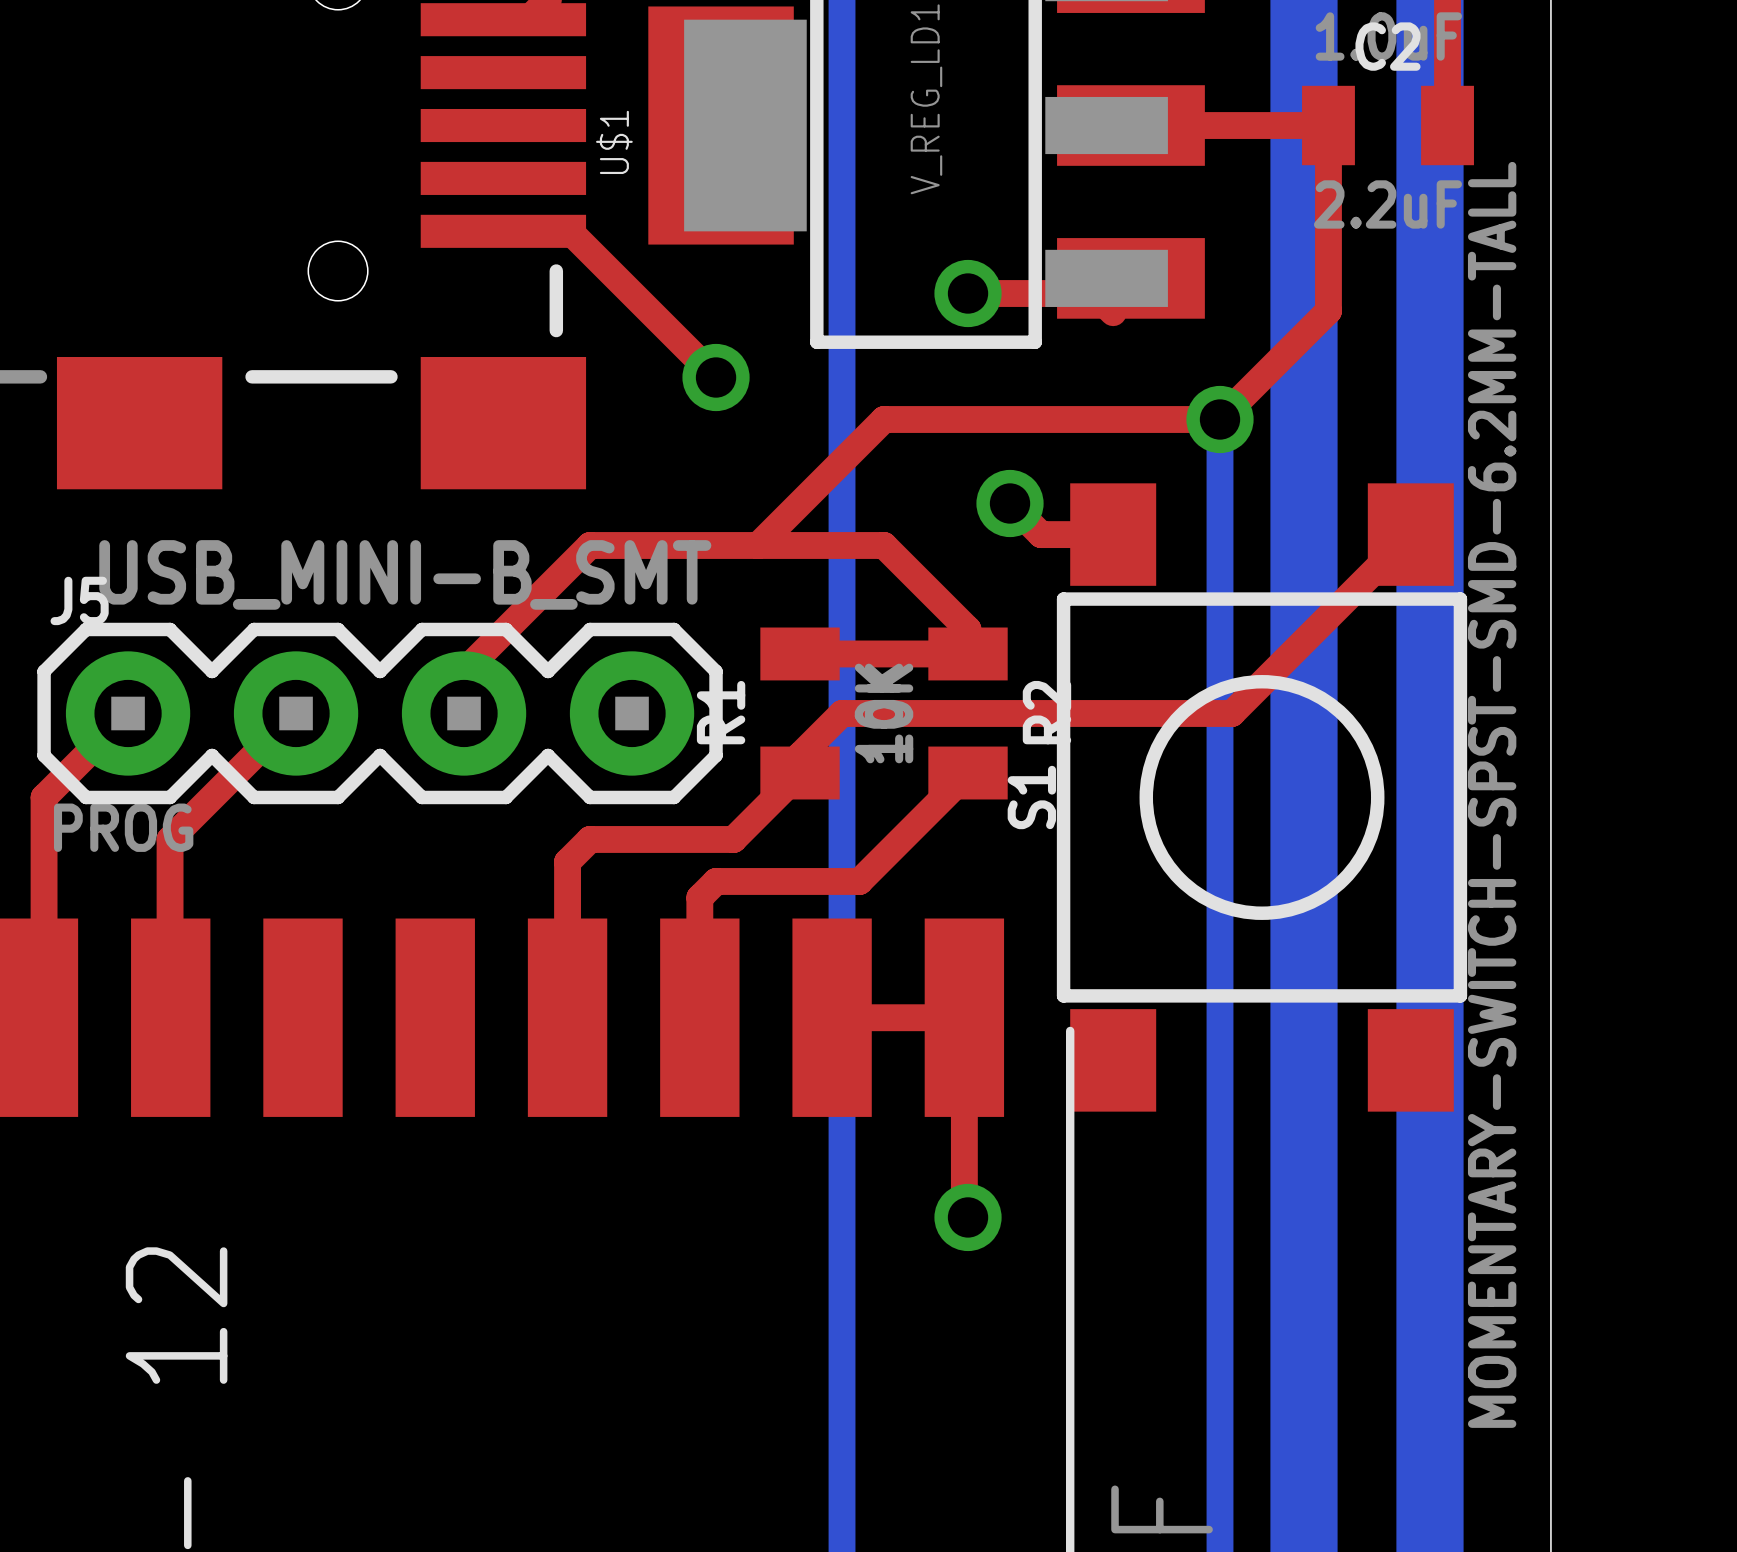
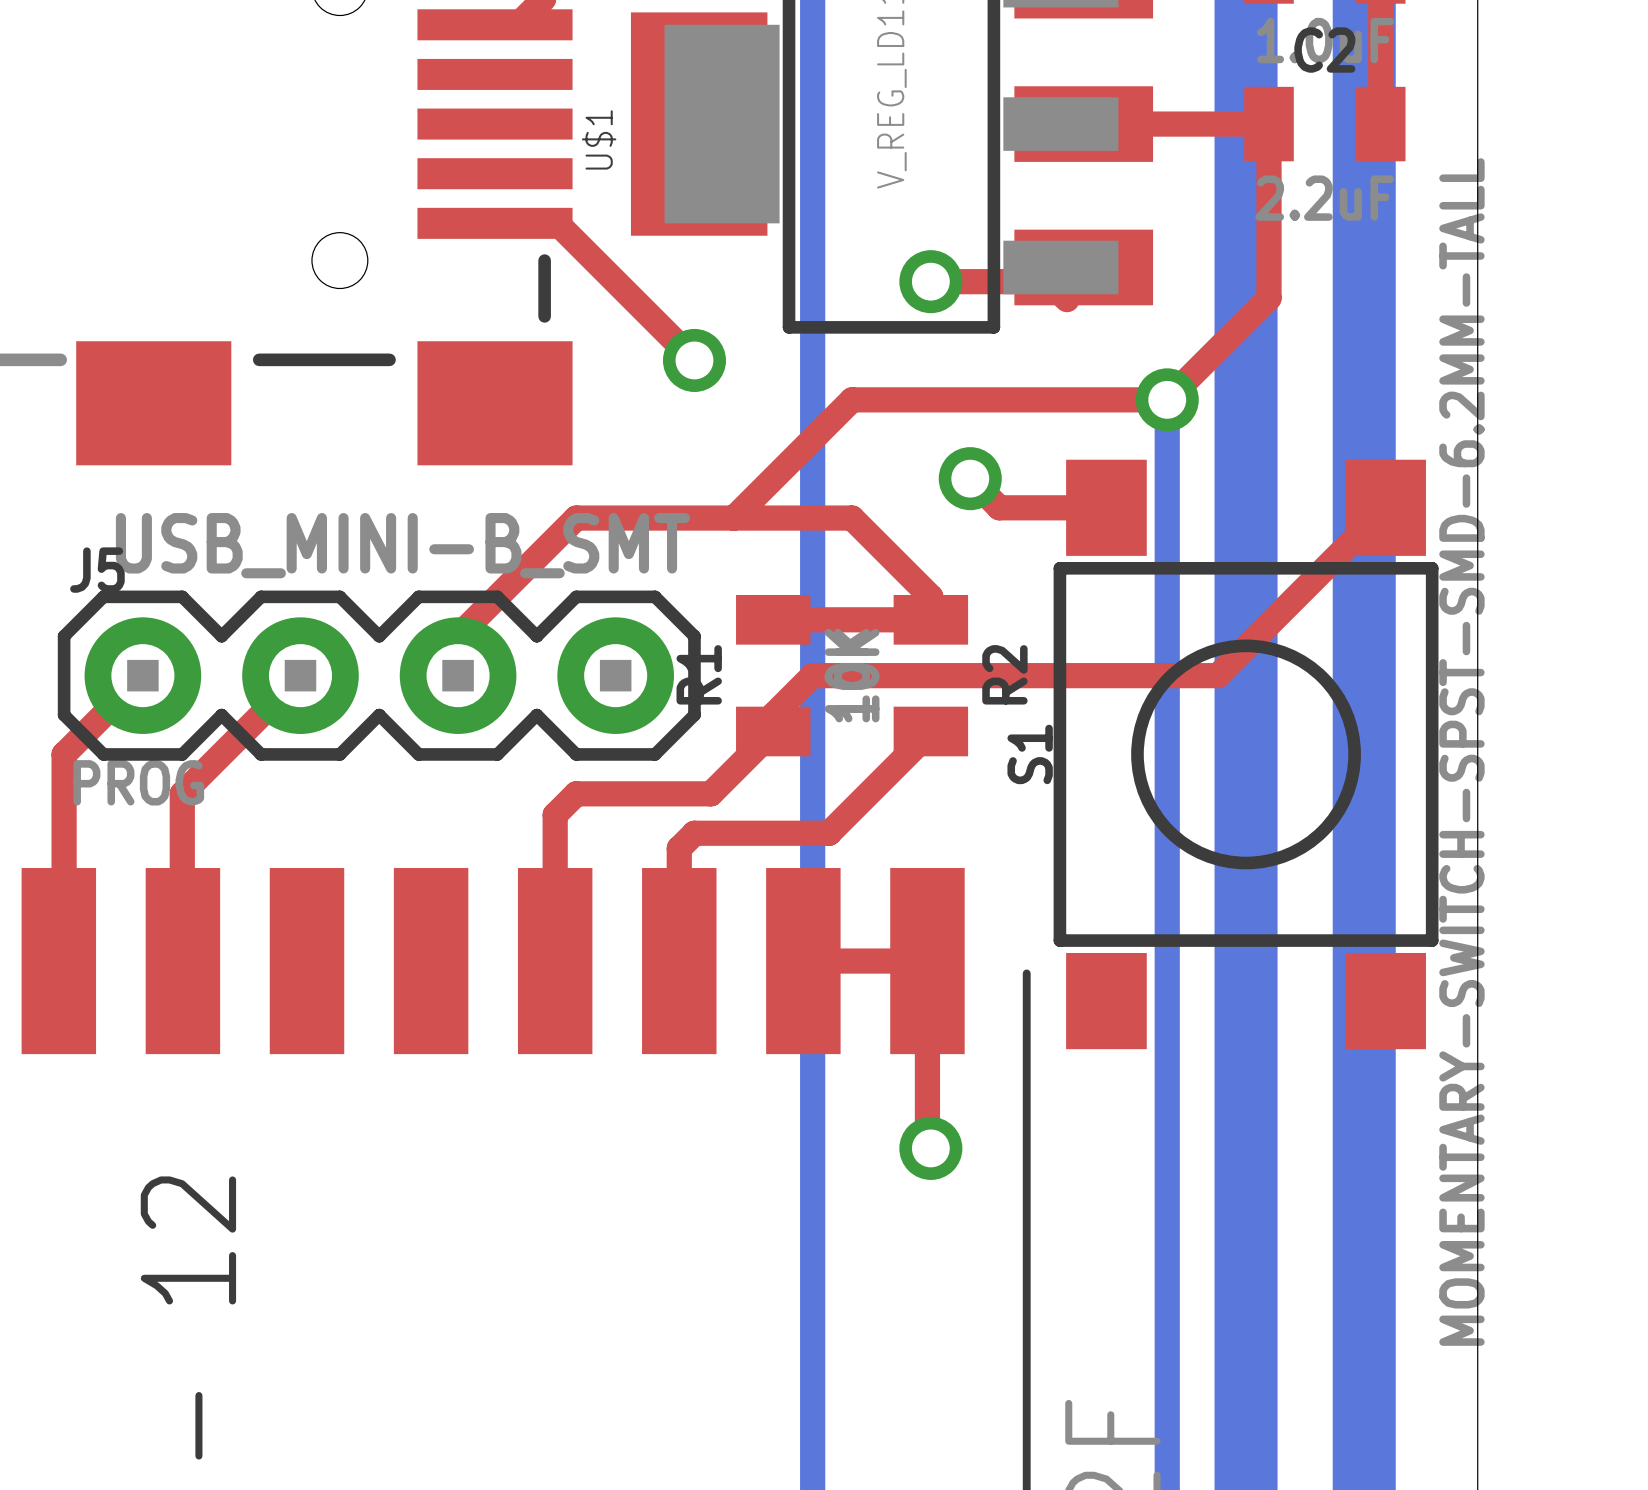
top track: (1410, 534) (1231, 713) -> (1385, 507) (1217, 675) (1178, 675)
S1 position: (1262, 797) -> (1246, 754)

